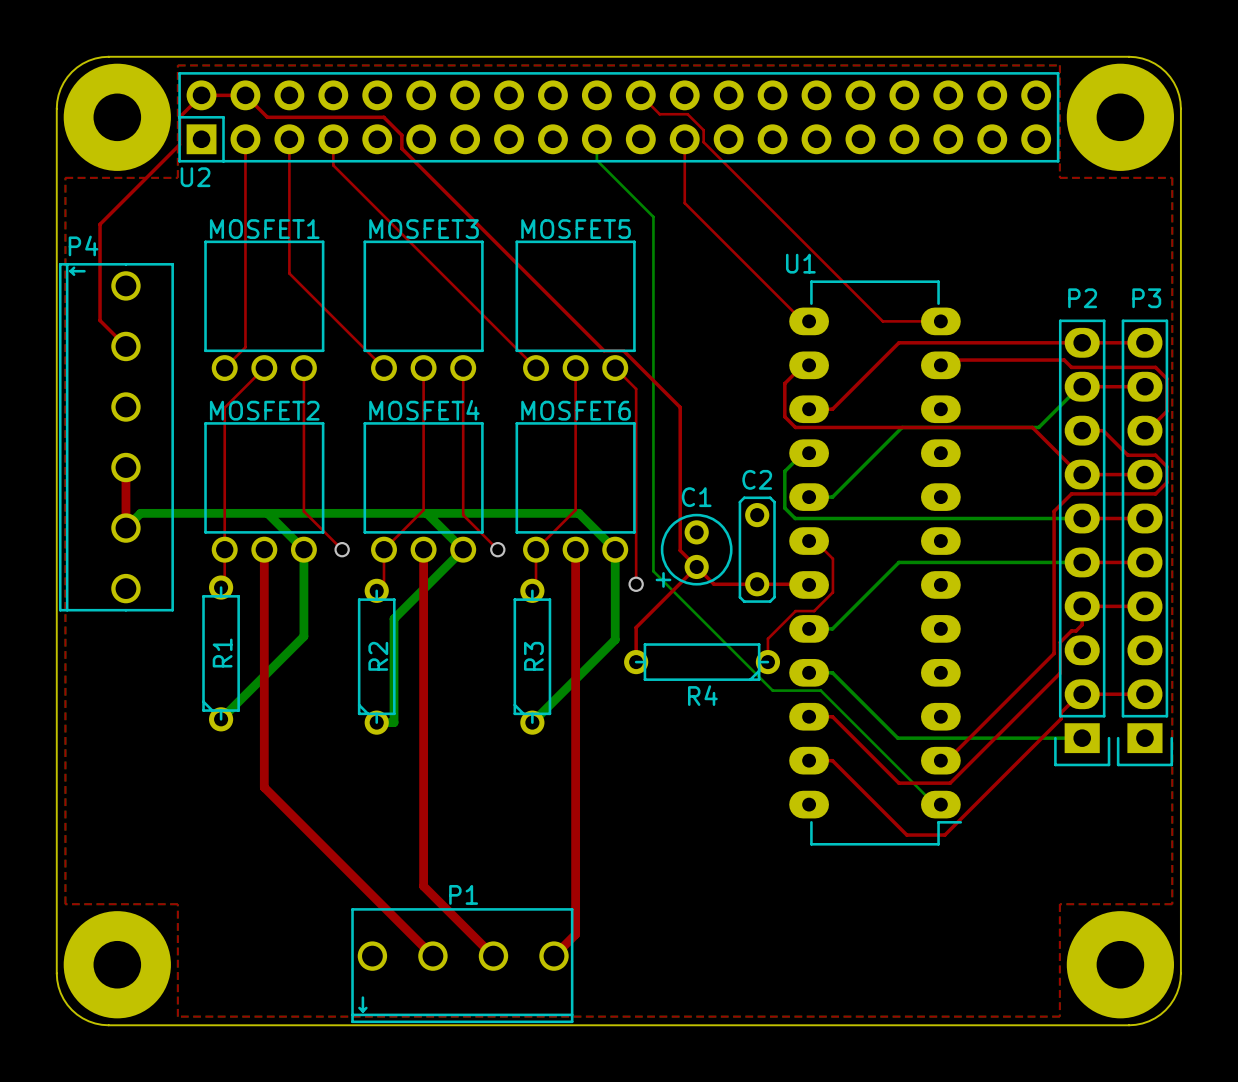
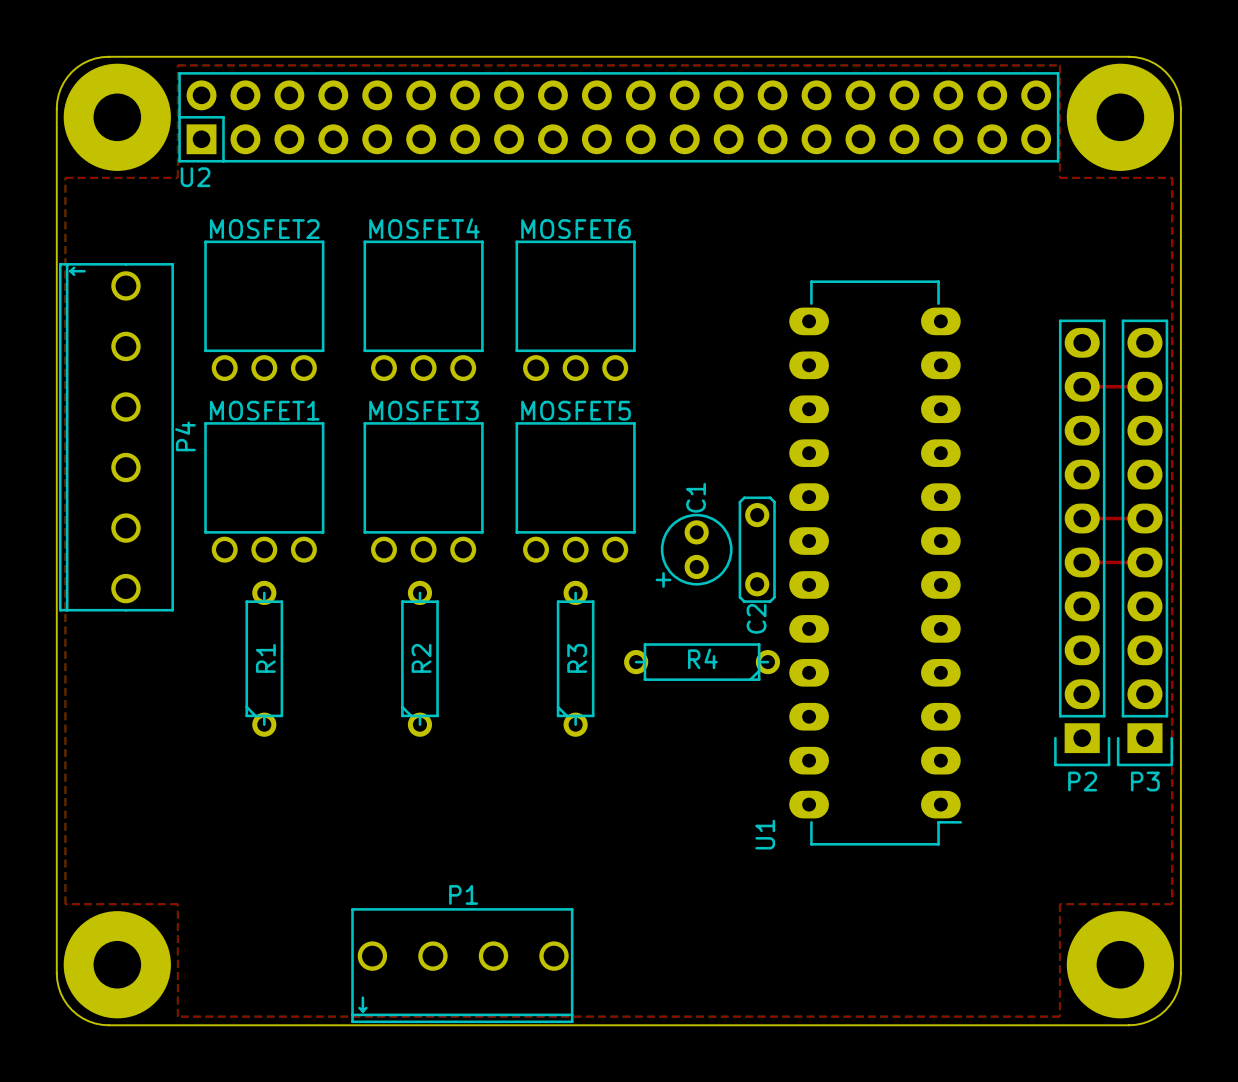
top track: (640, 95) (659, 114) (687, 114) (703, 130) (703, 142) (882, 321) (940, 321) -> none
top track: (245, 139) (245, 347) (224, 368) -> none
top track: (289, 139) (289, 273) (383, 368) -> none
top track: (333, 139) (333, 165) (536, 368) -> none
bottom track: (596, 139) (596, 160) (653, 216) (653, 571) (772, 690) (820, 690) (934, 804) (940, 804) -> none
top track: (684, 139) (684, 203) (803, 321) (809, 321) -> none
MOSFET1 name: MOSFET1 (264, 229) -> MOSFET2 (264, 229)
MOSFET3 name: MOSFET3 (424, 229) -> MOSFET4 (424, 228)
MOSFET5 name: MOSFET5 (576, 229) -> MOSFET6 (576, 229)
P4 name rotation: 0° (83, 245) -> 90° counterclockwise (185, 436)
P4 name position: P4 (83, 245) -> P4 (185, 436)
U1 name rotation: 0° (800, 263) -> 90° counterclockwise (765, 834)
U1 name position: U1 (800, 263) -> U1 (765, 834)
P2 name position: P2 (1082, 298) -> P2 (1082, 781)
P3 name position: P3 (1146, 298) -> P3 (1145, 781)
top track: (1144, 342) (898, 342) (832, 409) (809, 409) -> none
top track: (125, 346) (100, 320) (100, 224) (179, 144) (179, 117) (201, 95) (245, 95) (267, 117) (383, 117) (401, 135) (401, 148) (604, 350) (623, 350) (680, 407) (680, 550) (713, 584) (809, 584) -> none
top track: (809, 365) (803, 365) (784, 383) (784, 416) (795, 427) (1032, 427) (1079, 474) (1144, 474) -> none
top track: (940, 365) (946, 360) (1064, 360) (1071, 367) (1155, 367) (1166, 378) (1166, 411) (1147, 430) (1144, 430) -> none
top track: (264, 368) (224, 407) (224, 583) (221, 587) -> none
top track: (303, 368) (303, 511) (342, 549) -> none
top track: (423, 368) (423, 510) (383, 549) (383, 583) (376, 590) -> none
top track: (463, 368) (463, 515) (497, 549) -> none
top track: (575, 368) (575, 510) (536, 549) (536, 587) (532, 590) -> none
top track: (615, 368) (636, 389) (636, 584) -> none
bottom track: (1082, 386) (1079, 386) (1038, 427) (902, 427) (832, 497) (809, 497) -> none
MOSFET2 name: MOSFET2 (264, 410) -> MOSFET1 (264, 410)
MOSFET4 name: MOSFET4 (424, 410) -> MOSFET3 (424, 410)
MOSFET6 name: MOSFET6 (576, 410) -> MOSFET5 (576, 410)
top track: (1082, 430) (1103, 430) (1127, 455) (1155, 455) (1166, 466) (1166, 482) (1155, 493) (1071, 493) (1054, 511) (1054, 653) (946, 760) (940, 760) -> none
bottom track: (809, 453) (803, 453) (784, 471) (784, 508) (795, 518) (1082, 518) -> none
top track: (125, 467) (125, 528) -> none
C2 name rotation: 0° (757, 479) -> 90° counterclockwise (756, 618)
C2 name position: C2 (757, 479) -> C2 (756, 618)
C1 name rotation: 0° (696, 497) -> 90° counterclockwise (696, 497)
bottom track: (267, 513) (303, 549) (303, 636) (221, 719) -> none
bottom track: (426, 513) (463, 549) (394, 618) (394, 722) (376, 722) -> none
bottom track: (125, 528) (140, 513) (578, 513) (615, 549) (615, 639) (532, 722) -> none
top track: (809, 541) (815, 541) (832, 558) (832, 592) (814, 611) (795, 611) (767, 638) (767, 662) -> none
top track: (264, 549) (264, 787) (432, 956) -> none
via: (342, 549) -> none
top track: (423, 549) (423, 886) (493, 956) -> none
via: (497, 549) -> none
top track: (575, 549) (575, 934) (554, 956) -> none
bottom track: (1082, 562) (898, 562) (832, 628) (809, 628) -> none
top track: (696, 566) (636, 627) (636, 662) -> none
via: (636, 584) -> none
top track: (1144, 606) (1082, 606) (1082, 624) (1076, 630) (1071, 630) (1060, 642) (1060, 673) (950, 783) (898, 783) (832, 716) (809, 716) -> none
R1 position: (221, 653) -> (264, 658)
R2 position: (376, 656) -> (419, 658)
R3 position: (532, 656) -> (575, 658)
bottom track: (809, 672) (832, 672) (897, 738) (1082, 738) -> none
top track: (1144, 694) (1079, 694) (1061, 712) (1061, 718) (944, 835) (906, 835) (832, 760) (809, 760) -> none
R4 name position: R4 (702, 695) -> R4 (702, 658)

